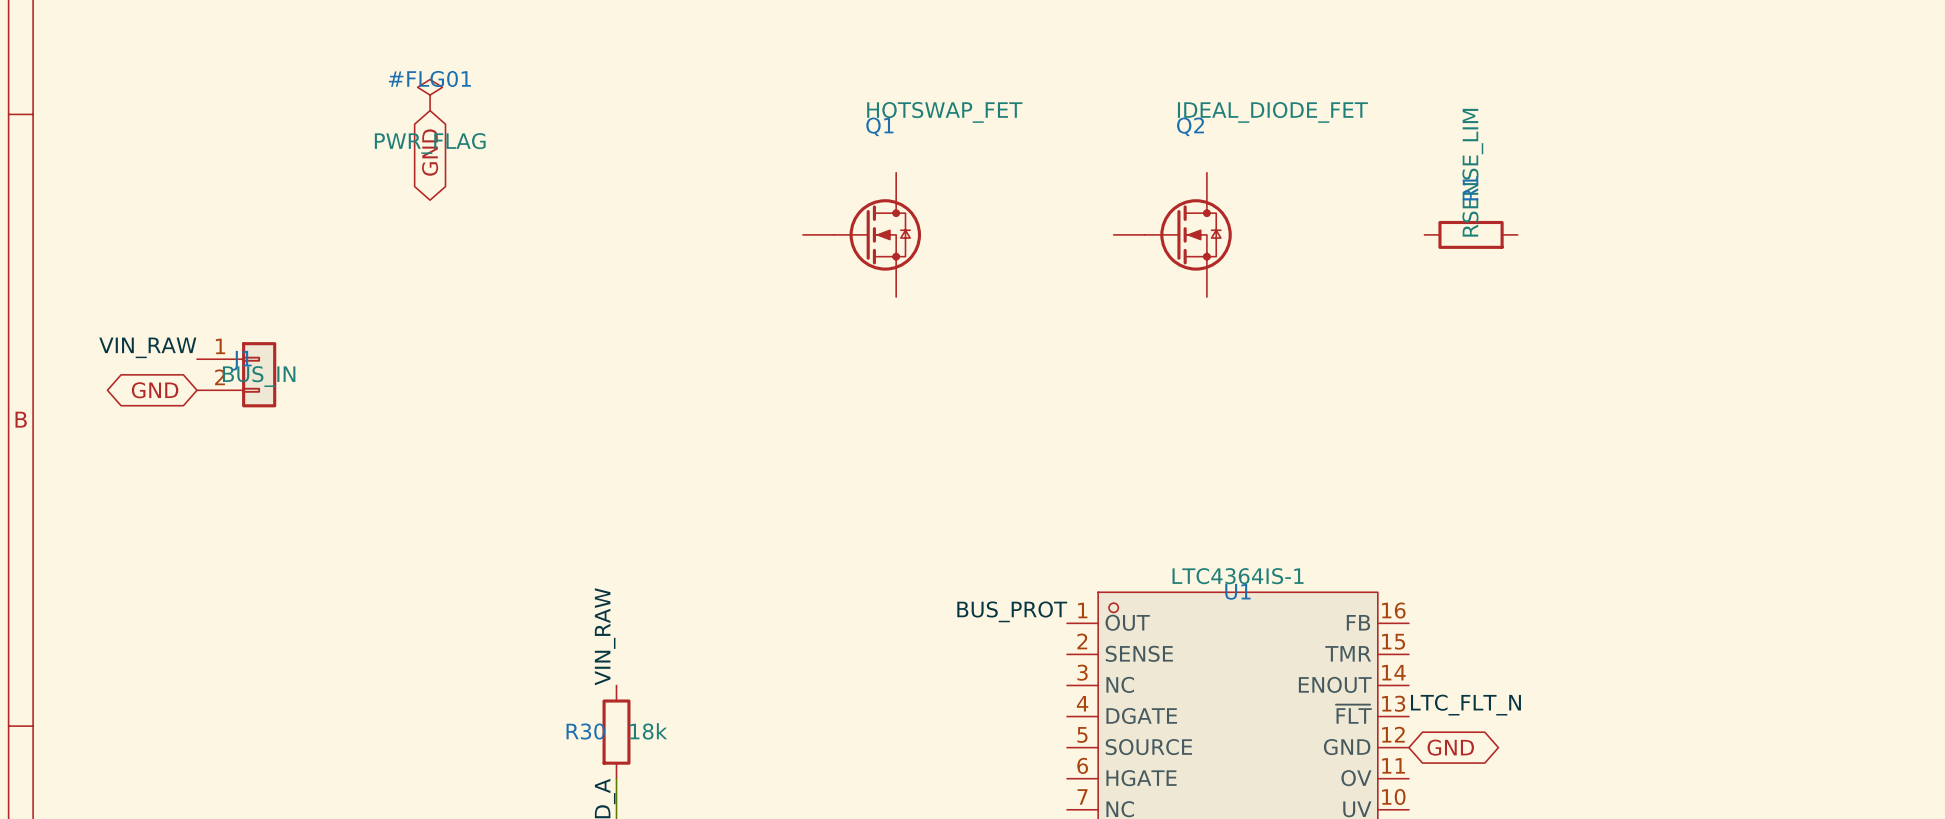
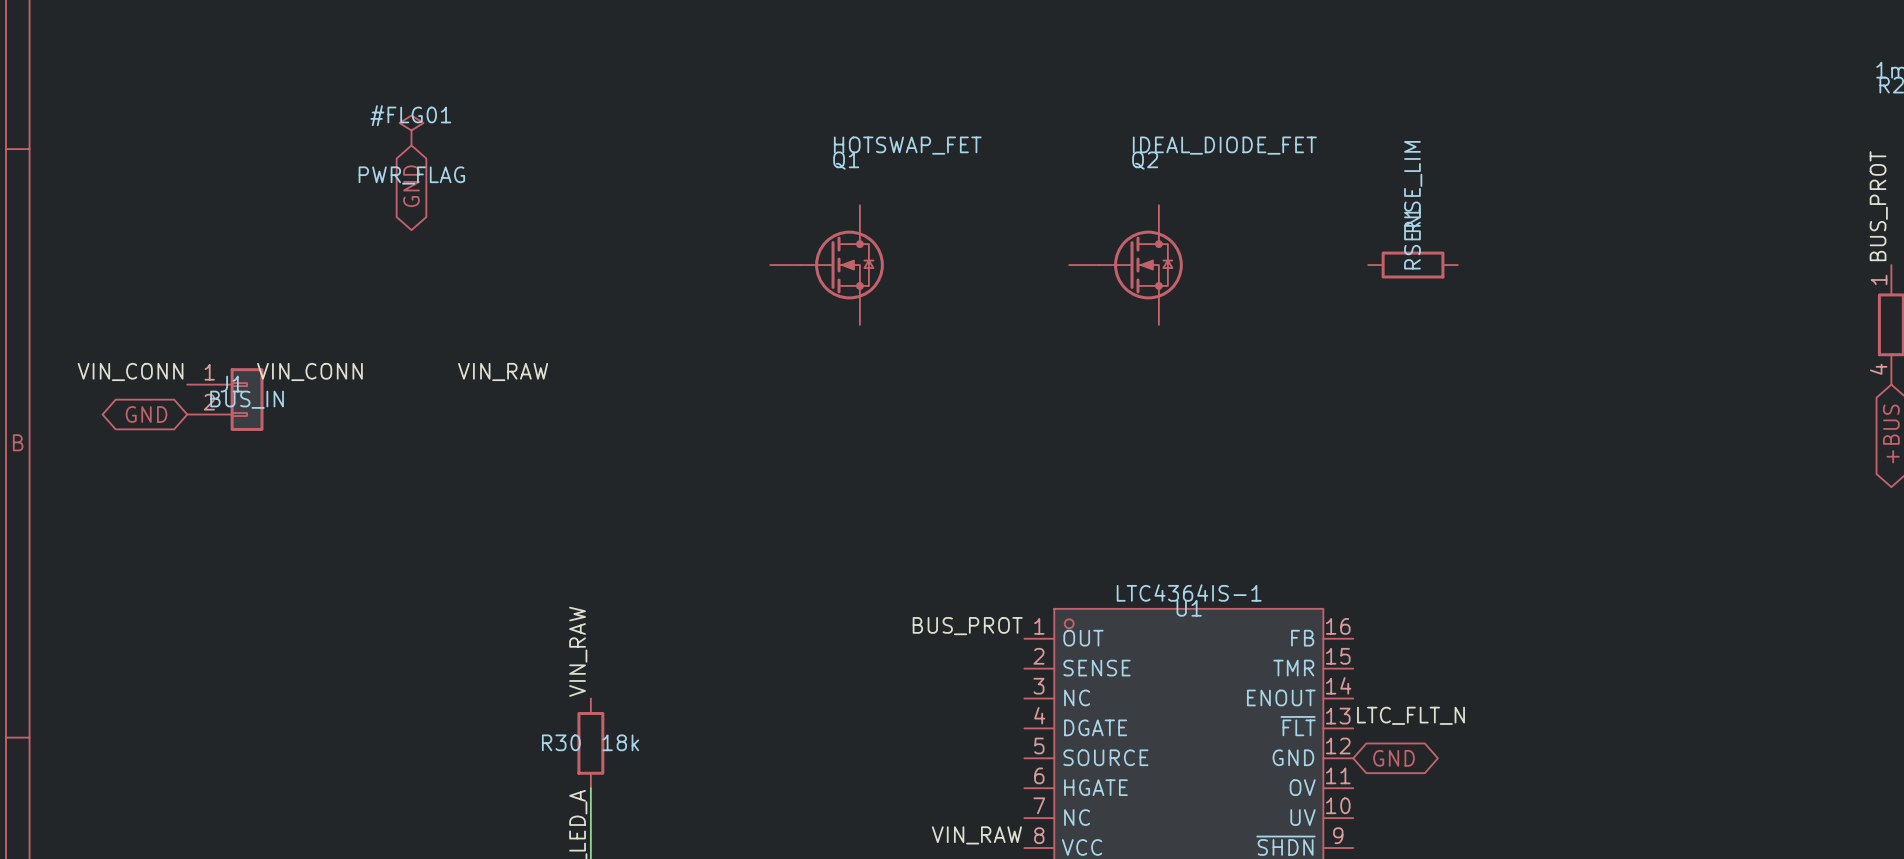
label: VIN_RAW (147, 347) -> VIN_CONN (130, 371)
label: none -> VIN_CONN (309, 371)
label: none -> VIN_RAW (503, 371)

